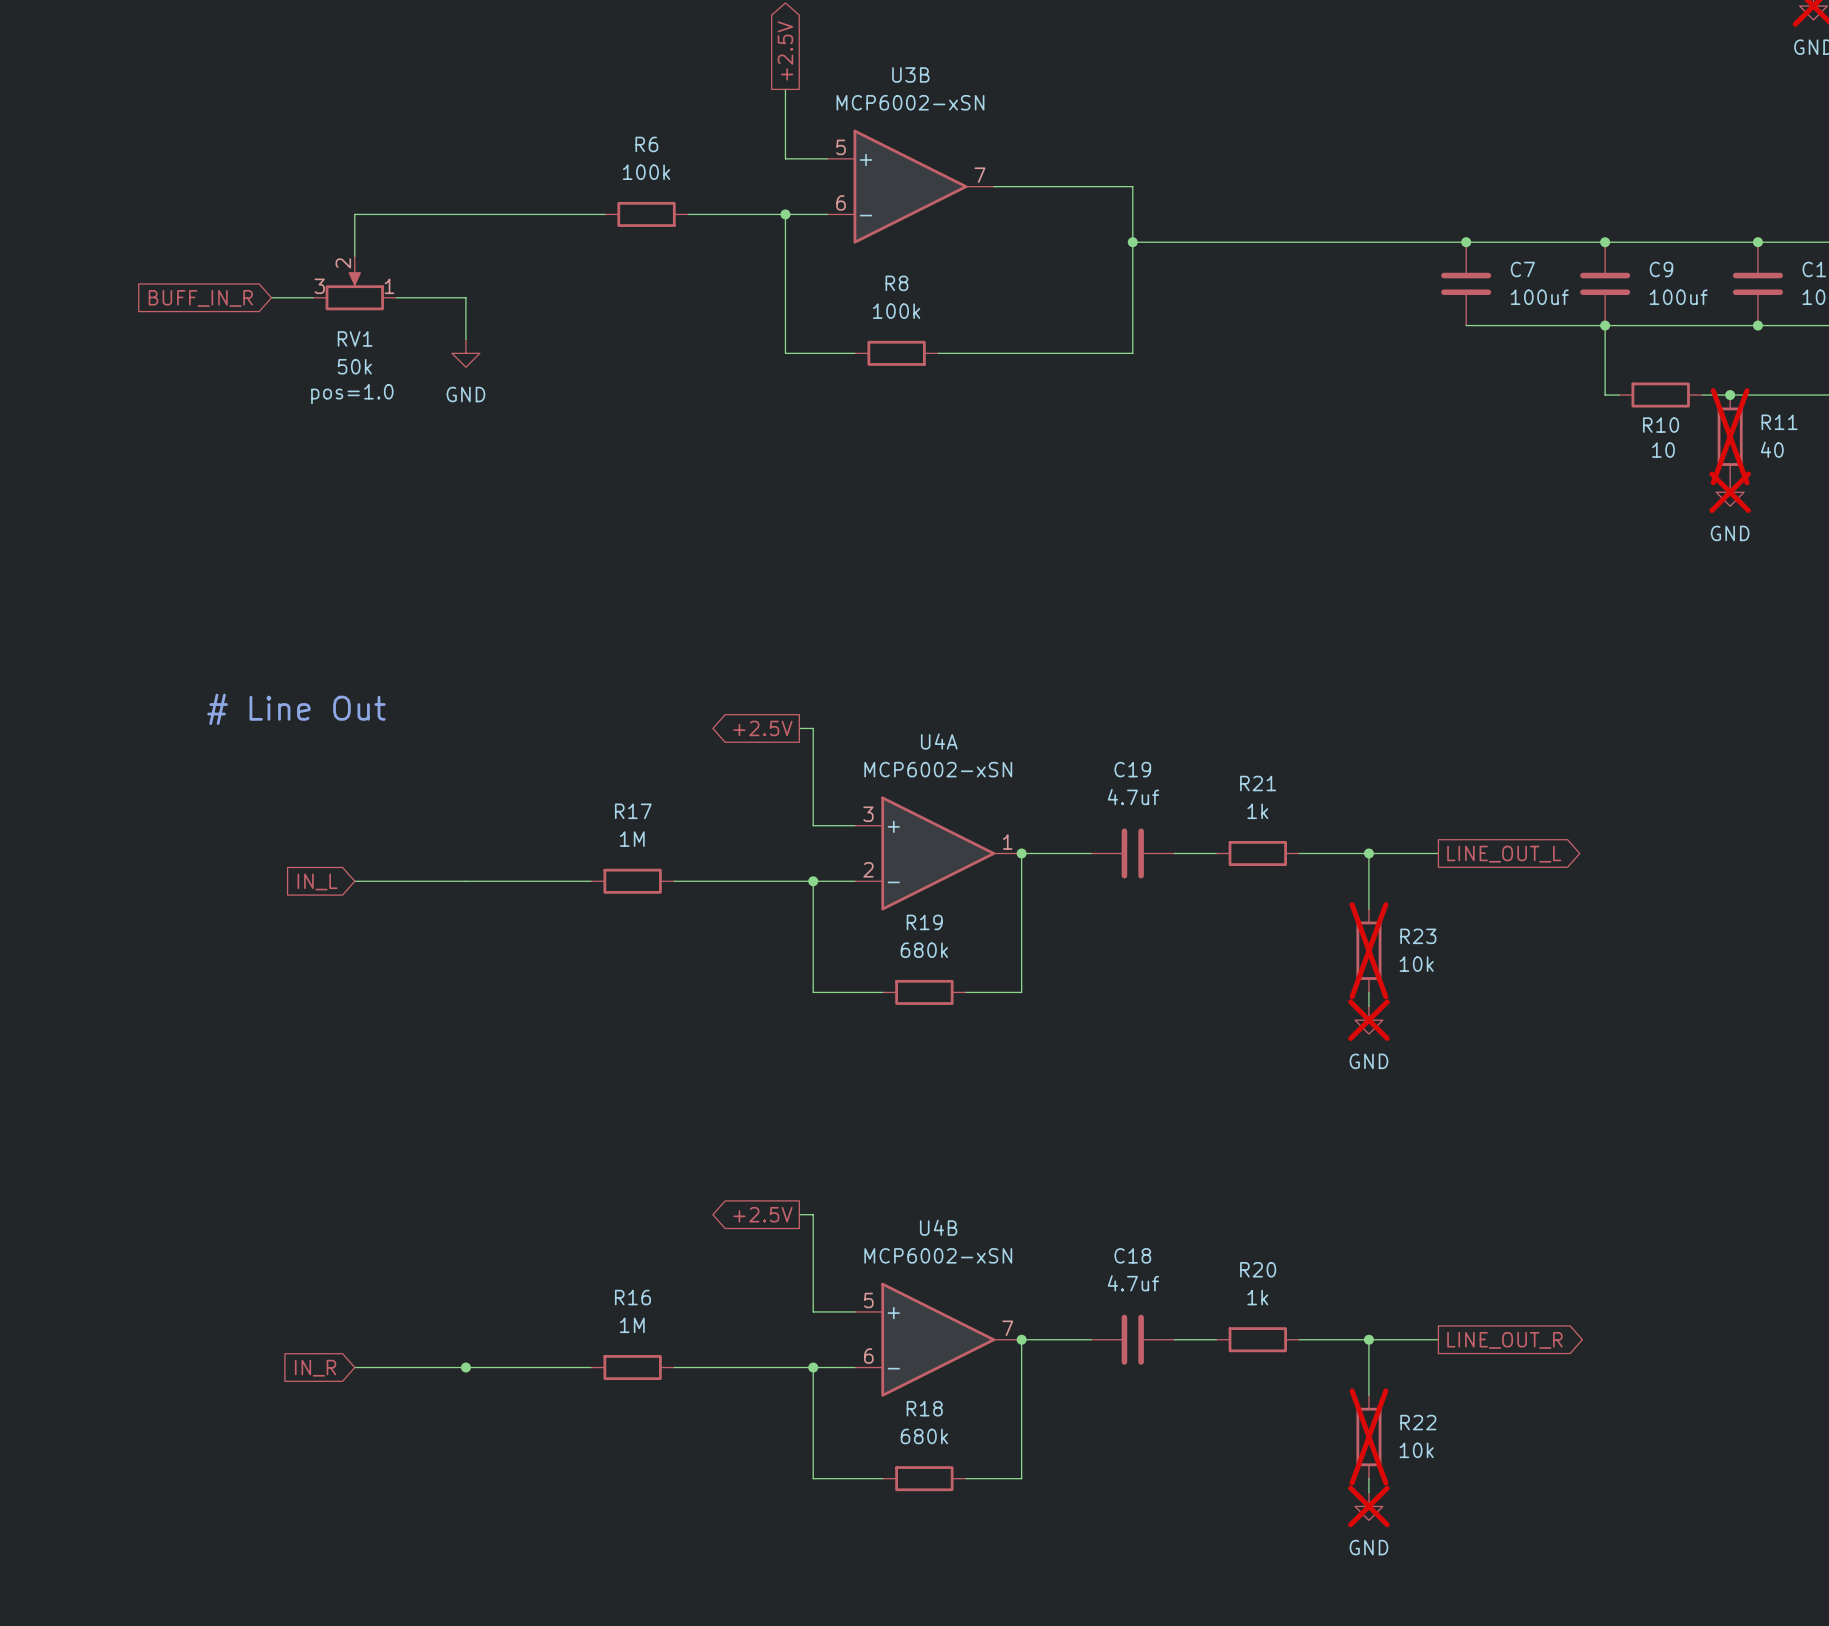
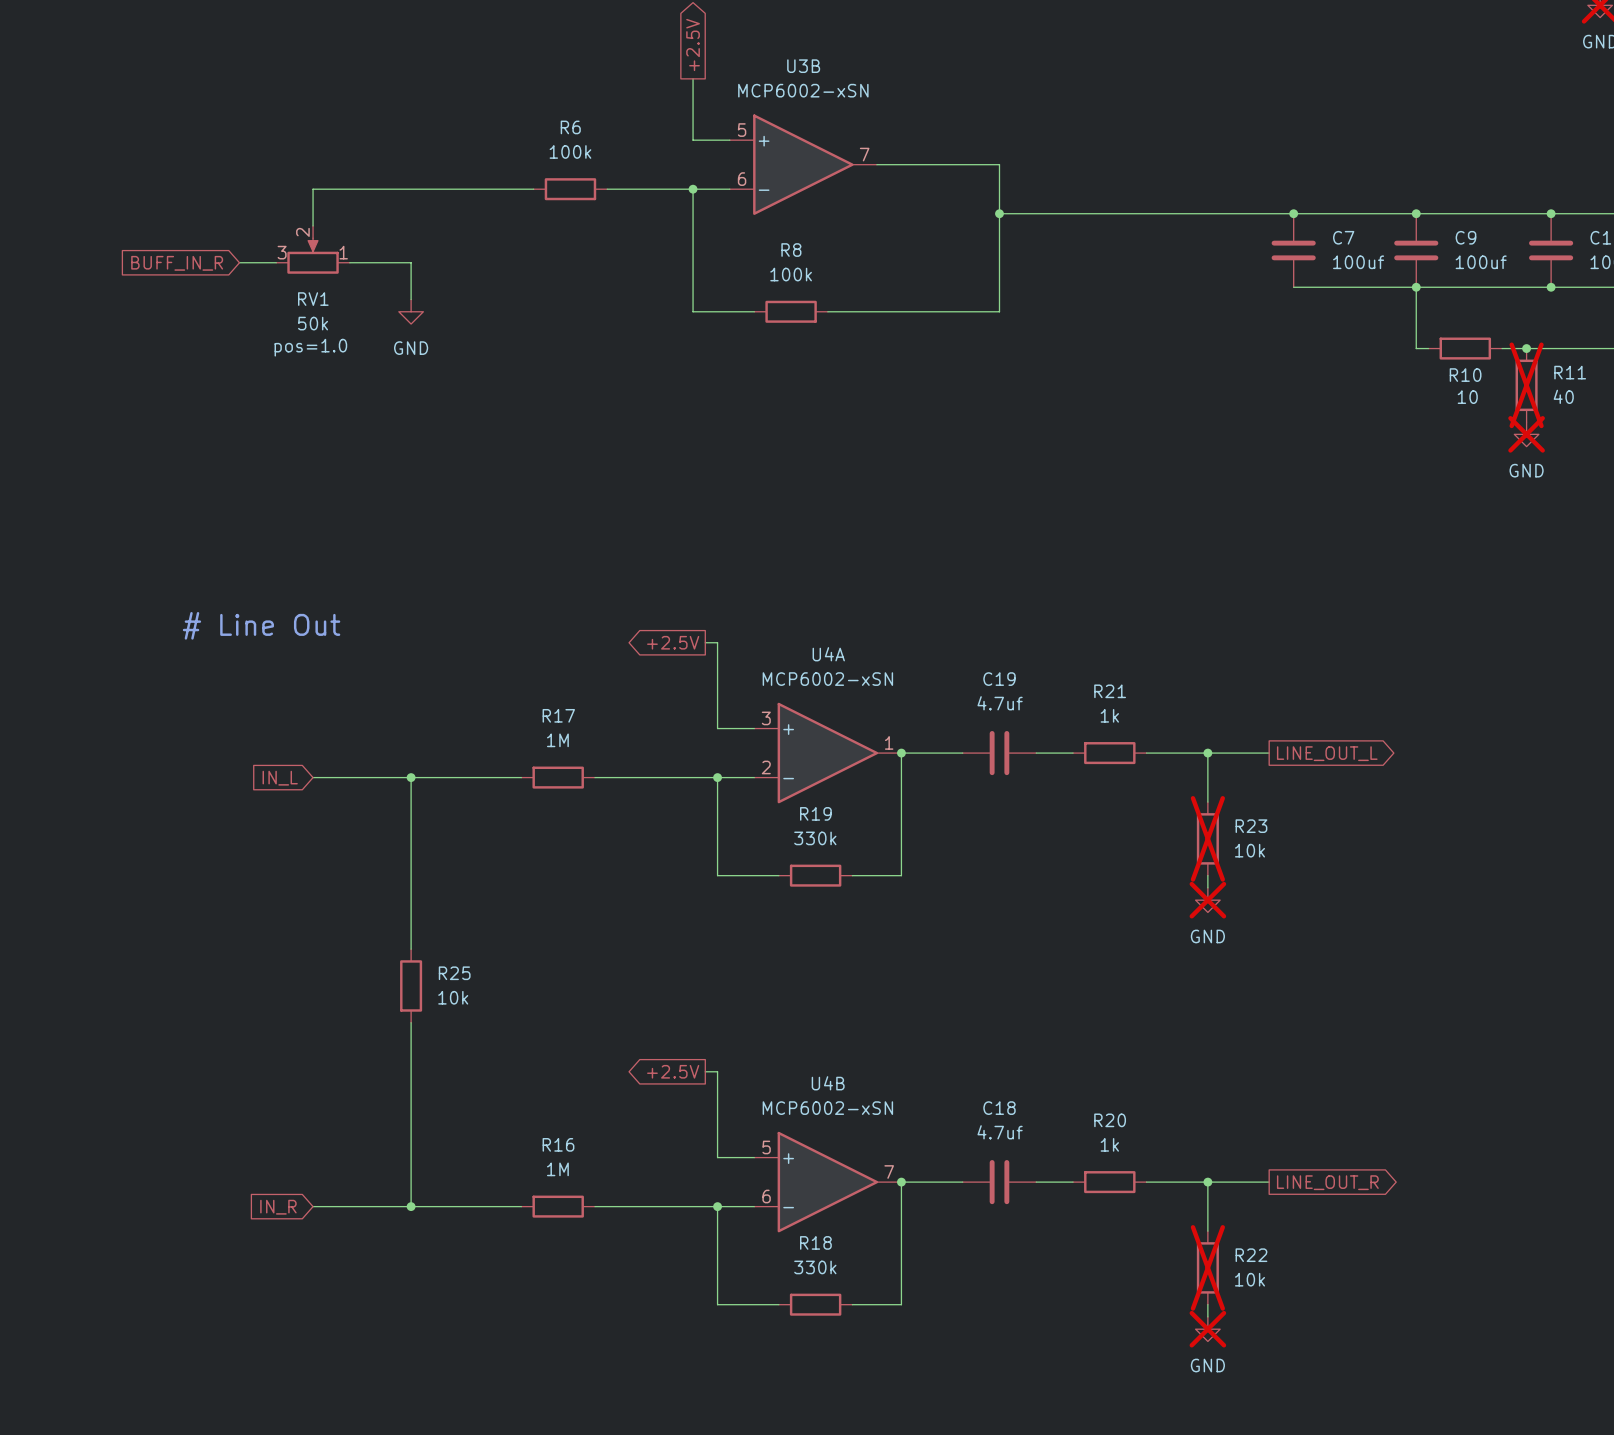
wire: none -> (411, 777) (411, 949)
junction: none -> (411, 777)
R19 value: 680k (924, 950) -> 330k (815, 838)
R25: none -> 10k (411, 985)
wire: none -> (411, 1022) (411, 1206)
R18 value: 680k (924, 1436) -> 330k (815, 1267)

